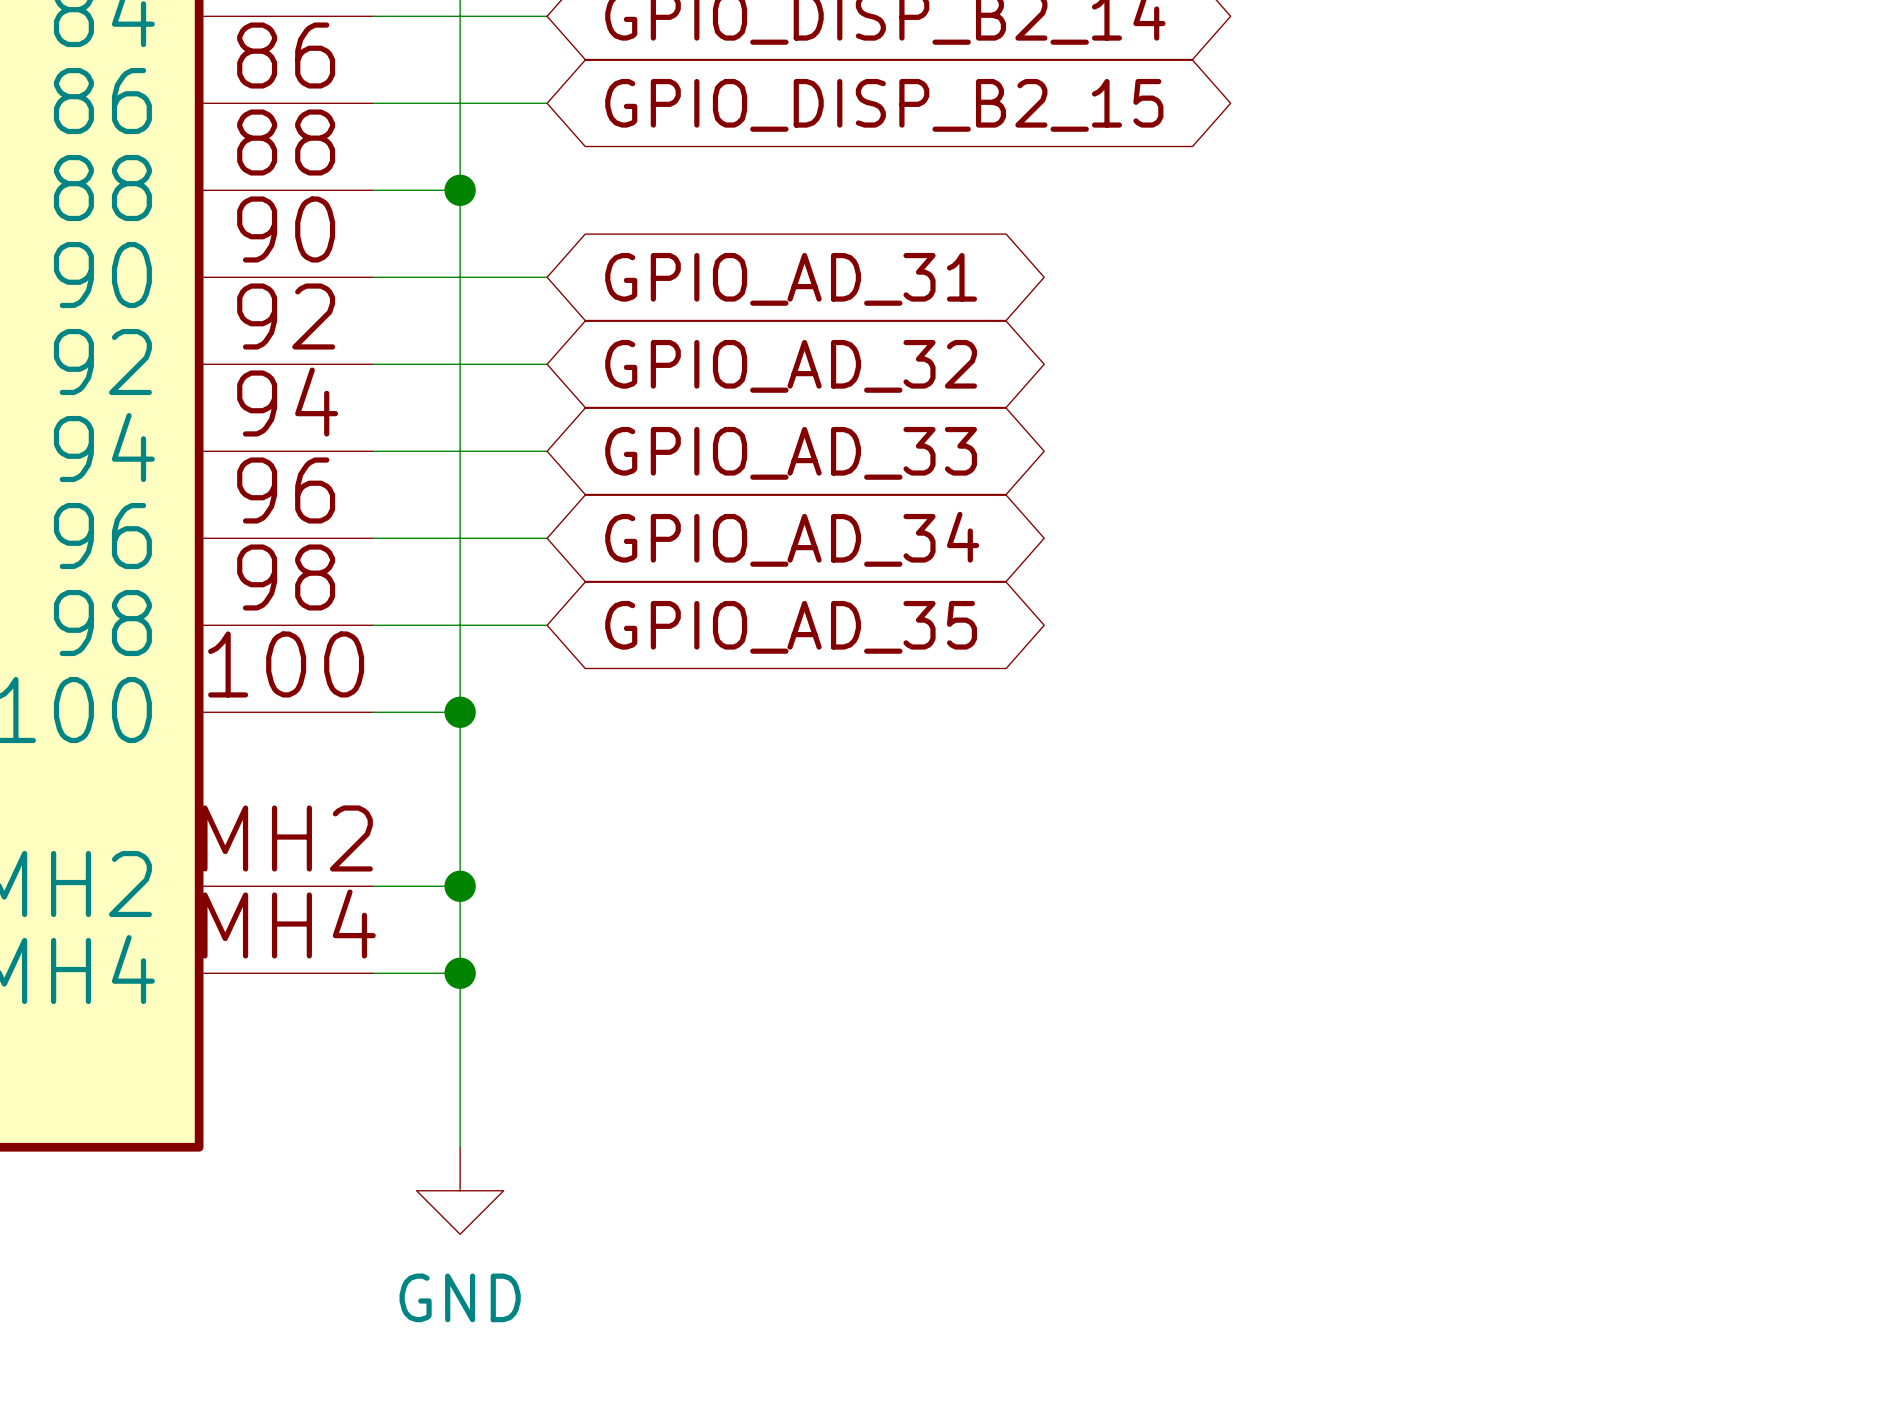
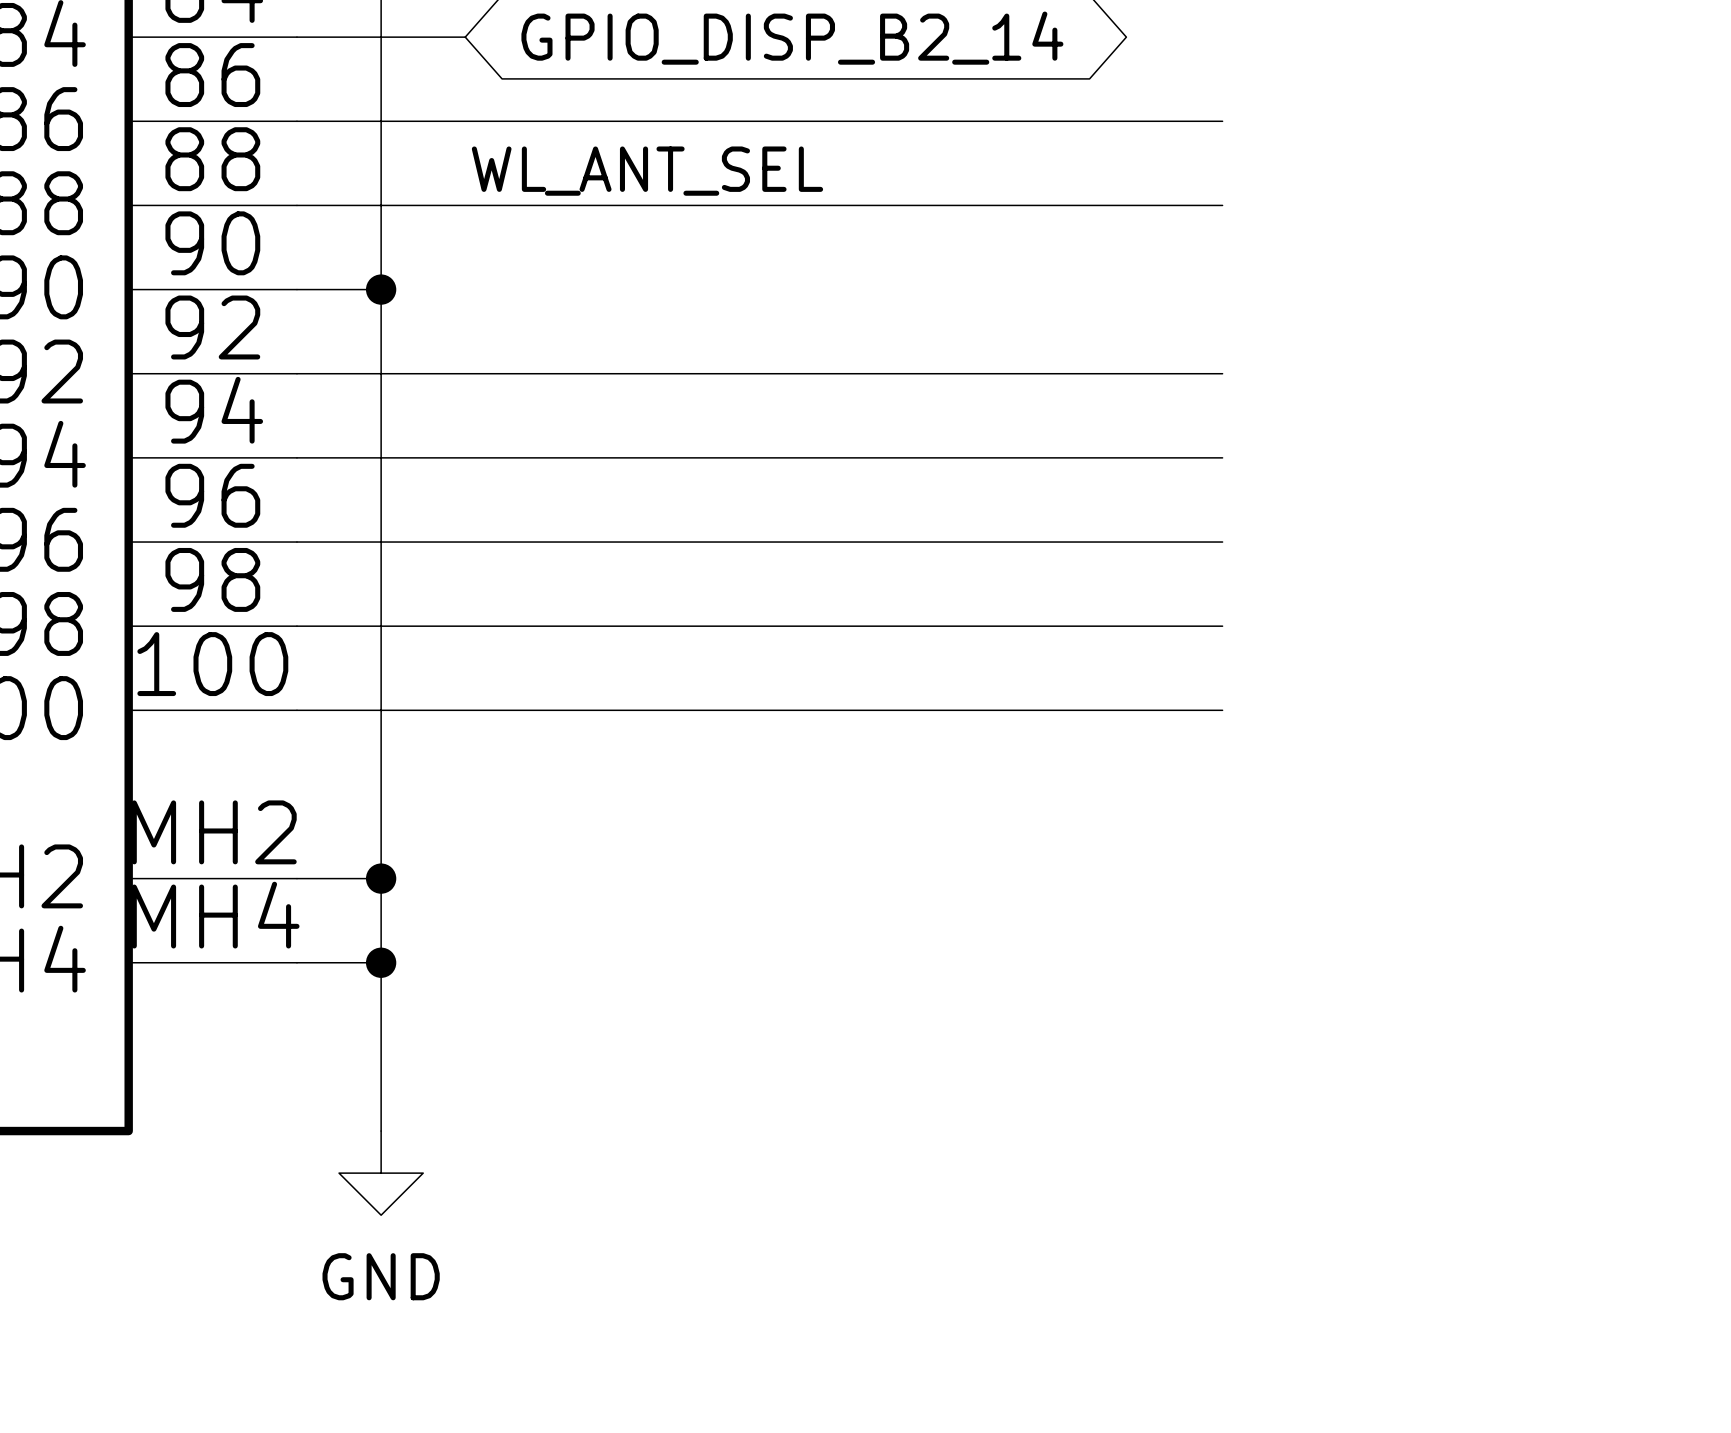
wire: none -> (465, 121) (1222, 121)
global label: GPIO_DISP_B2_15 (884, 105) -> none
label: none -> WL_ANT_SEL (647, 171)
wire: none -> (381, 205) (1222, 205)
junction position: (460, 190) -> (381, 289)
wire: (460, 277) (547, 277) -> none
global label: GPIO_AD_31 (791, 279) -> none
wire: none -> (465, 373) (1222, 373)
global label: GPIO_AD_32 (791, 366) -> none
wire: none -> (465, 457) (1222, 457)
global label: GPIO_AD_33 (791, 453) -> none
wire: none -> (465, 542) (1222, 542)
global label: GPIO_AD_34 (792, 539) -> none
wire: none -> (465, 626) (1222, 626)
global label: GPIO_AD_35 (791, 627) -> none
wire: none -> (381, 710) (1222, 710)
junction: (460, 712) -> none

